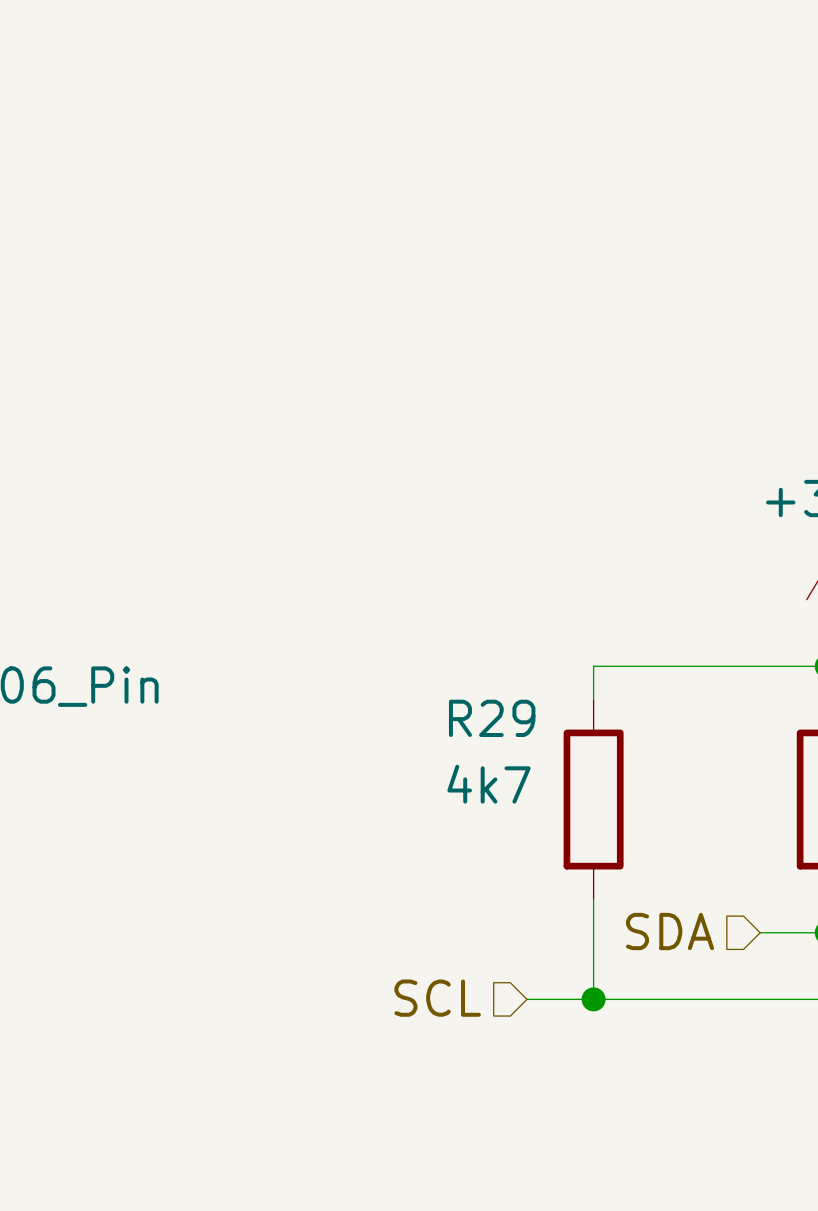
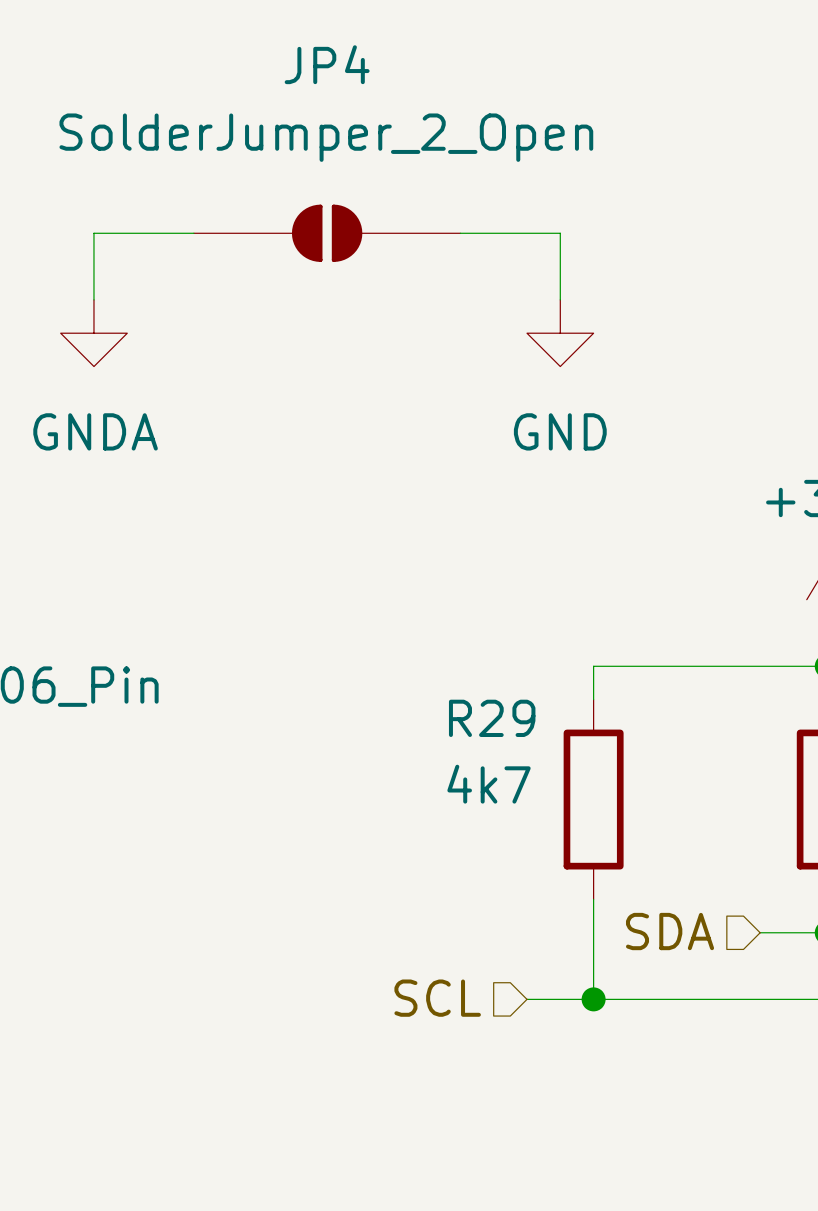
wire: none -> (193, 233) (93, 233) (93, 299)
JP4: none -> SolderJumper_2_Open (327, 233)
wire: none -> (460, 233) (560, 233) (560, 299)
power symbol: none -> GNDA (93, 333)
power symbol: none -> GND (560, 333)

